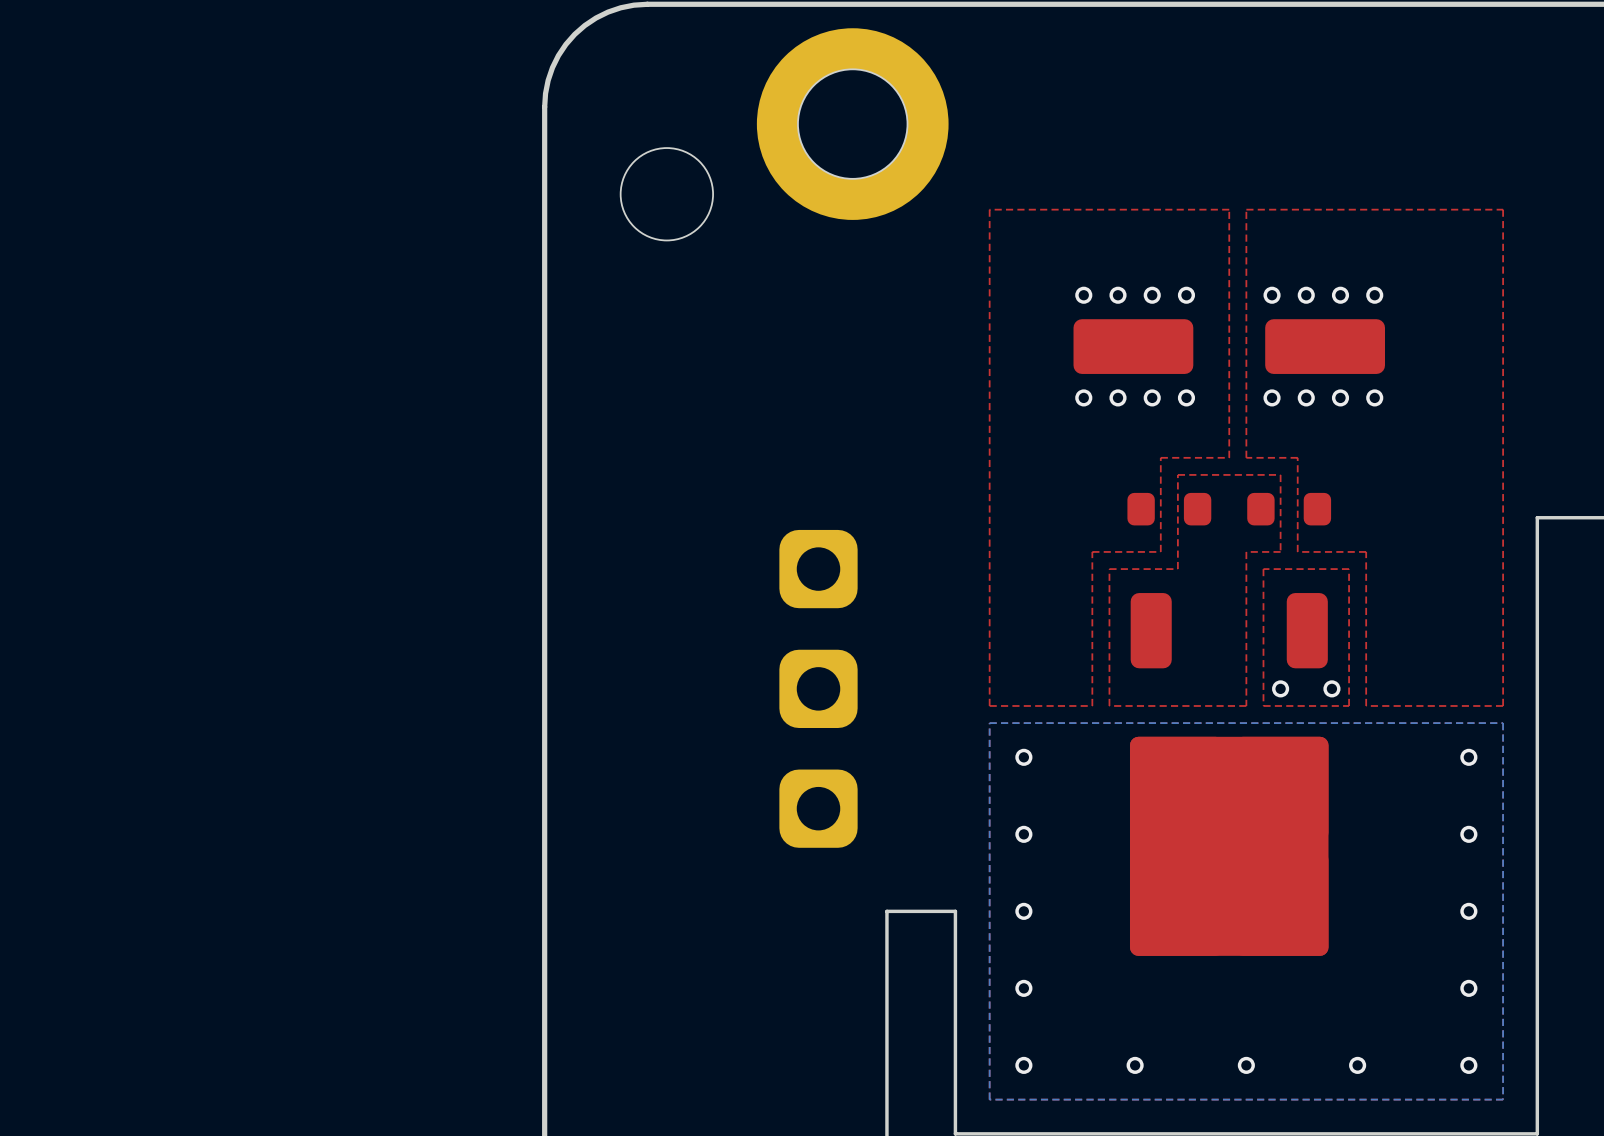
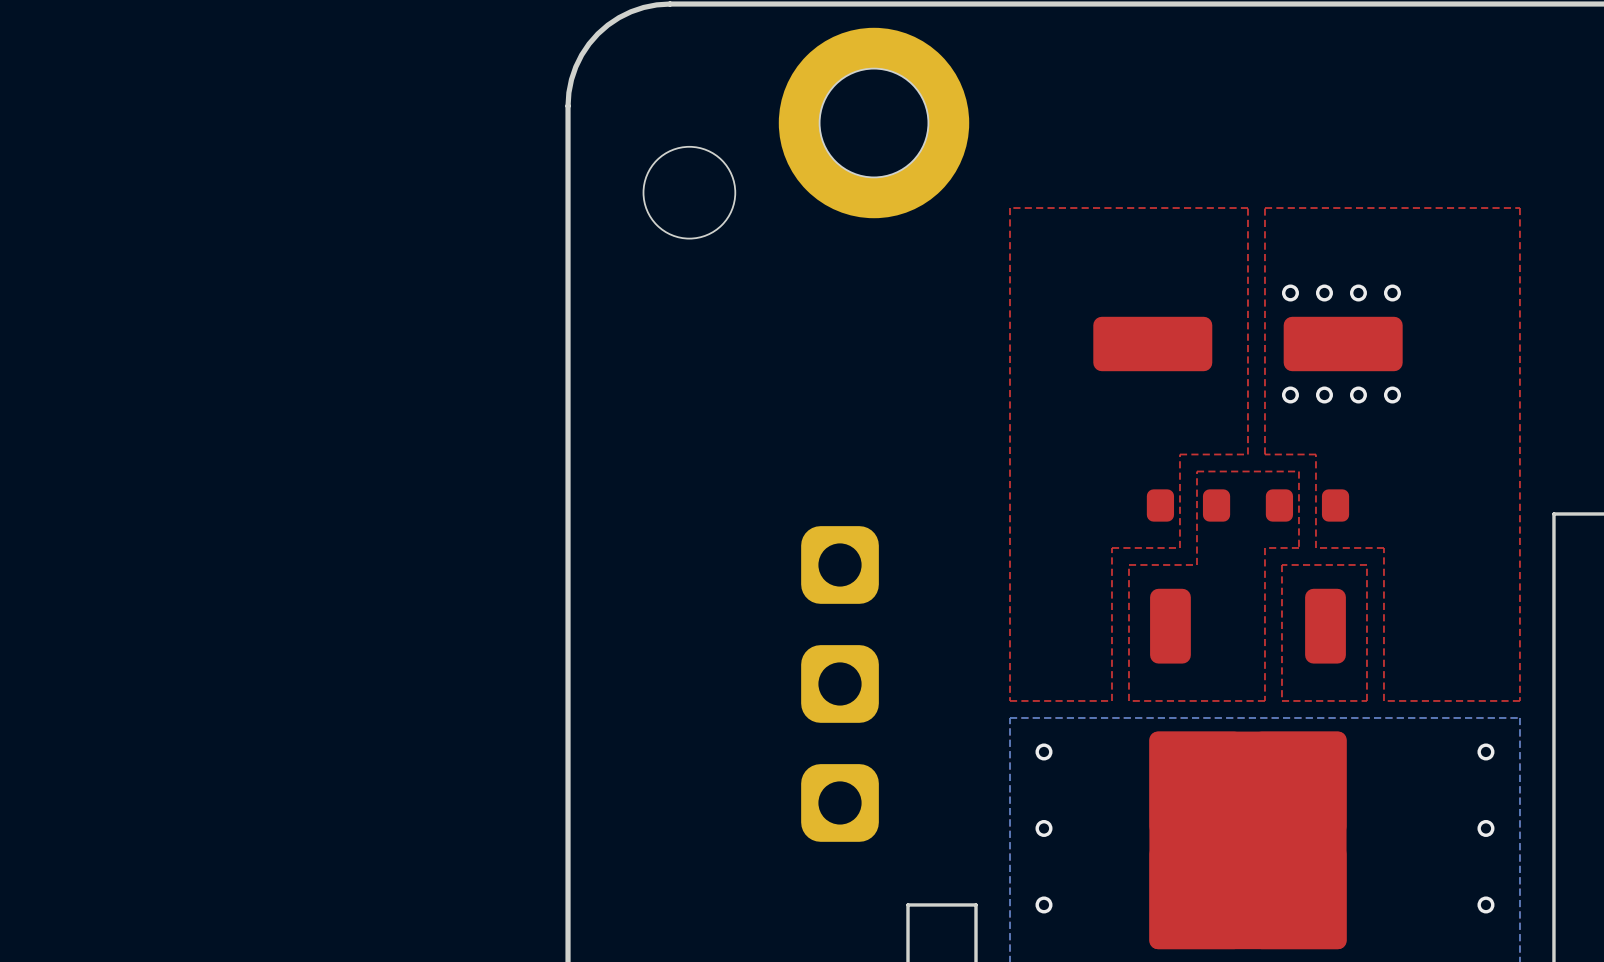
via: (1083, 295) -> none
via: (1118, 295) -> none
via: (1152, 295) -> none
via: (1186, 295) -> none
via: (1083, 397) -> none
via: (1118, 397) -> none
via: (1152, 397) -> none
via: (1186, 397) -> none
via: (1280, 688) -> none
via: (1331, 688) -> none

